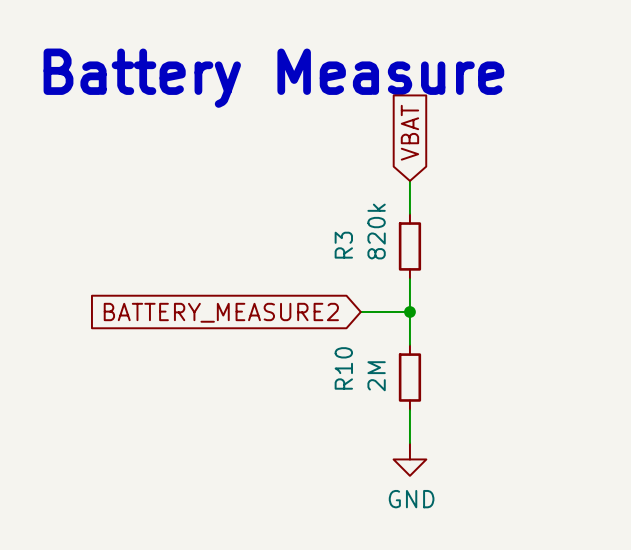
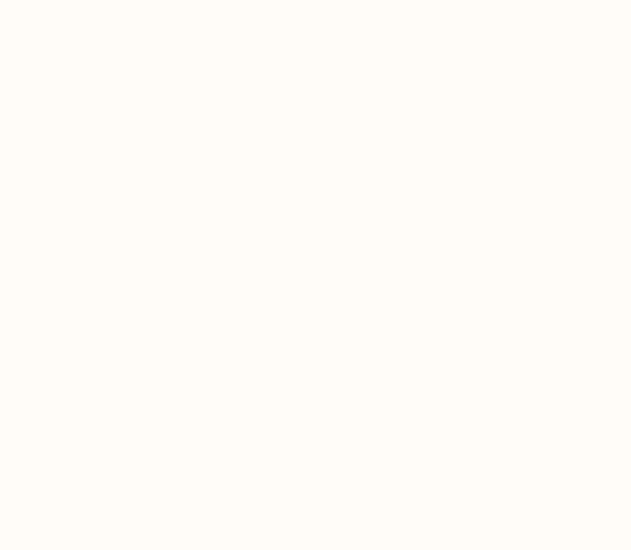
text: Battery Measure (273, 78) -> none
global label: VBAT (409, 132) -> none
wire: (409, 180) (409, 213) -> none
R3: 820k (409, 246) -> none
wire: (409, 279) (409, 344) -> none
wire: (360, 311) (409, 311) -> none
junction: (409, 311) -> none
global label: BATTERY_MEASURE2 (221, 312) -> none
R10: 2M (409, 377) -> none
wire: (409, 410) (409, 443) -> none
power symbol: GND (409, 459) -> none

